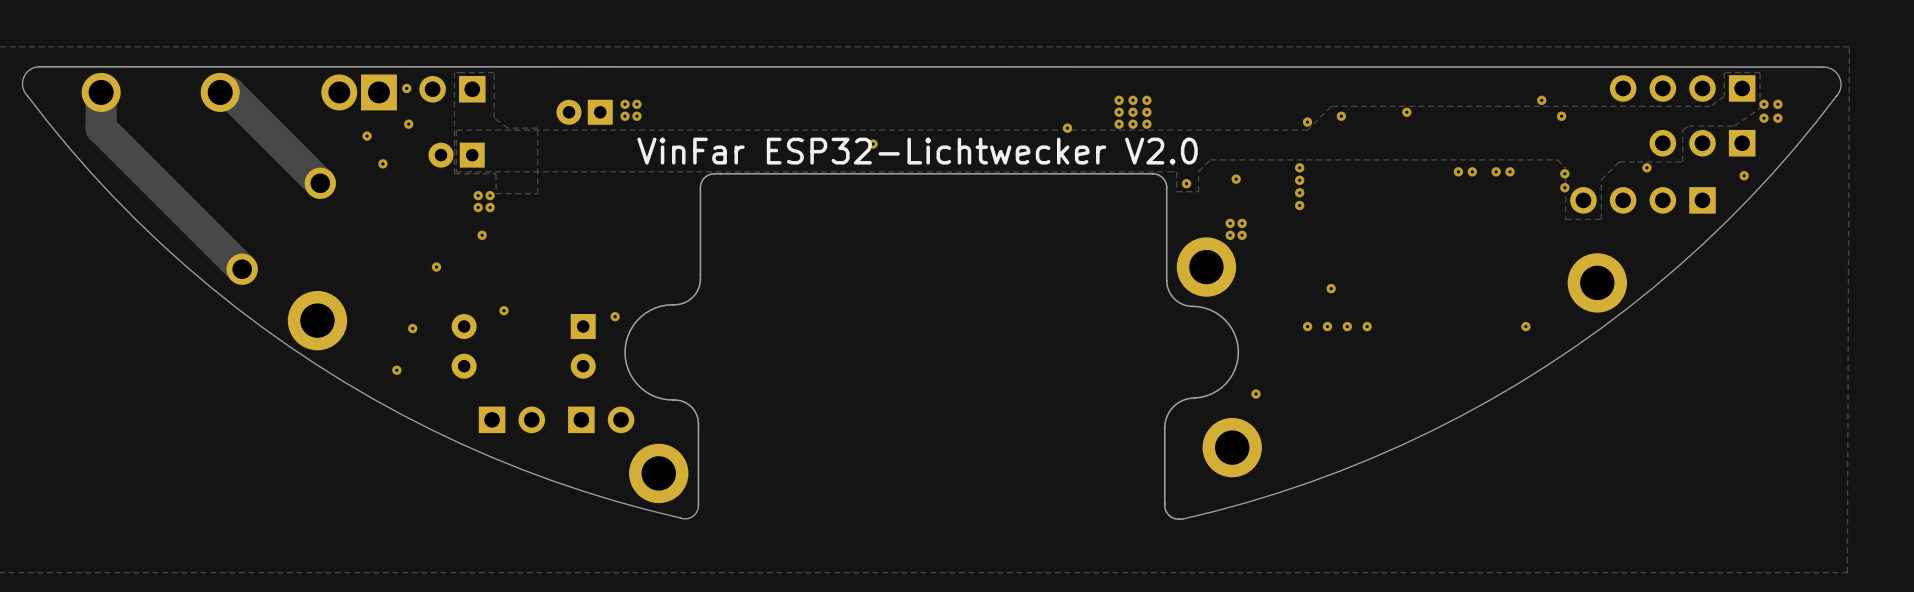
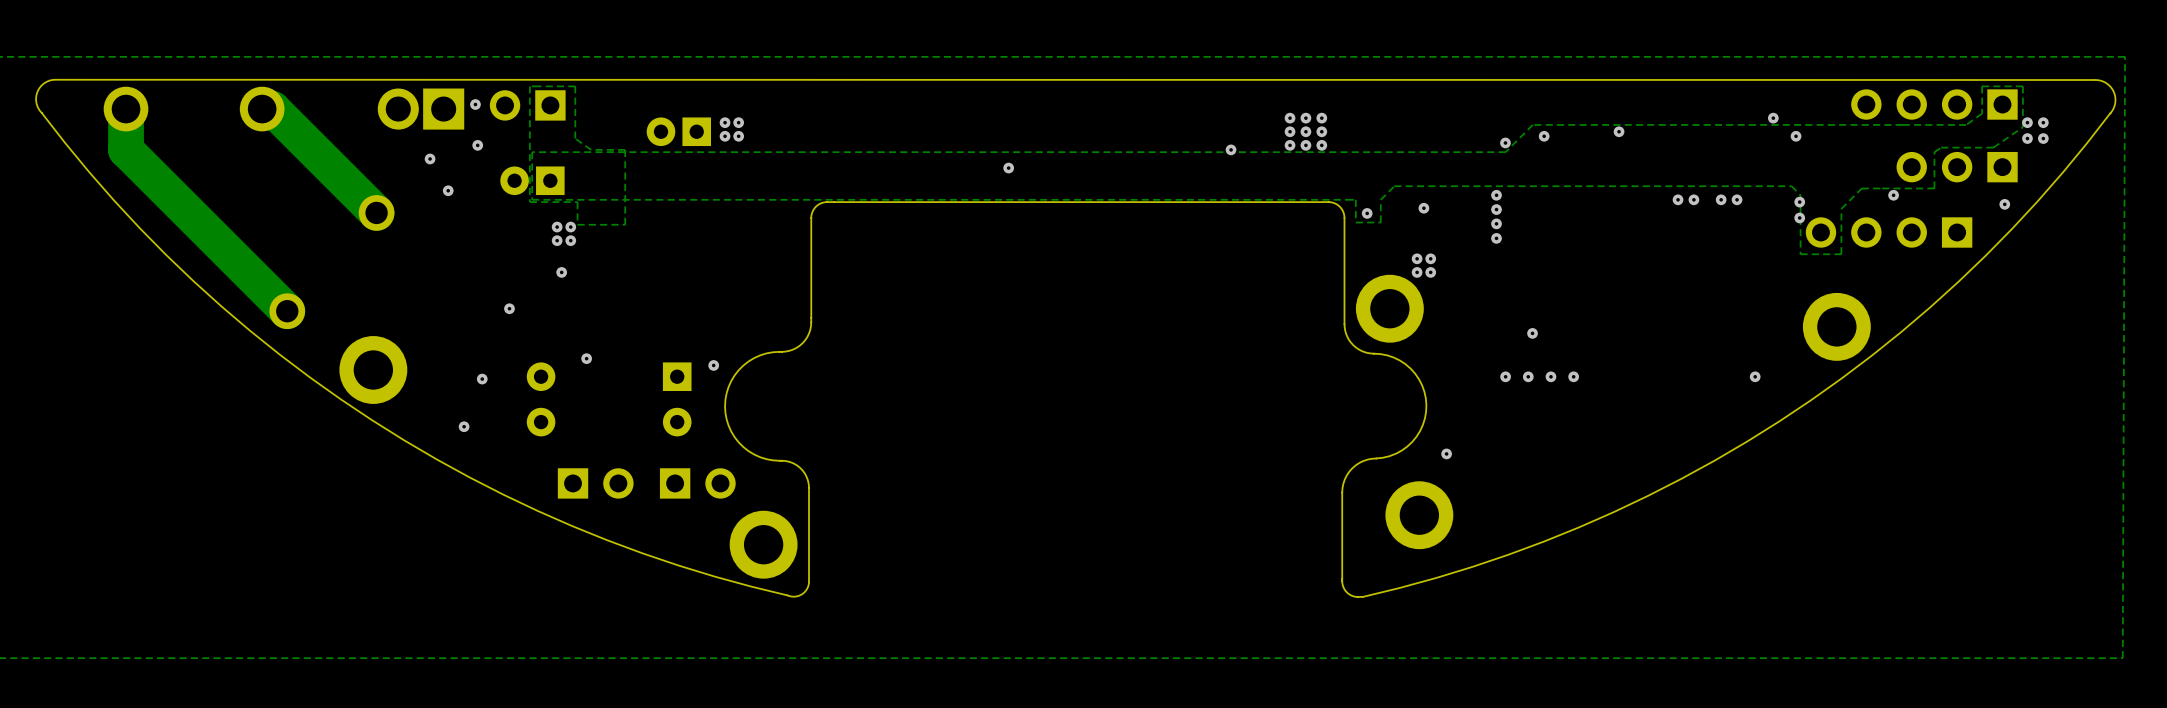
text: VinFar ESP32-Lichtwecker V2.0 (917, 151) -> none

